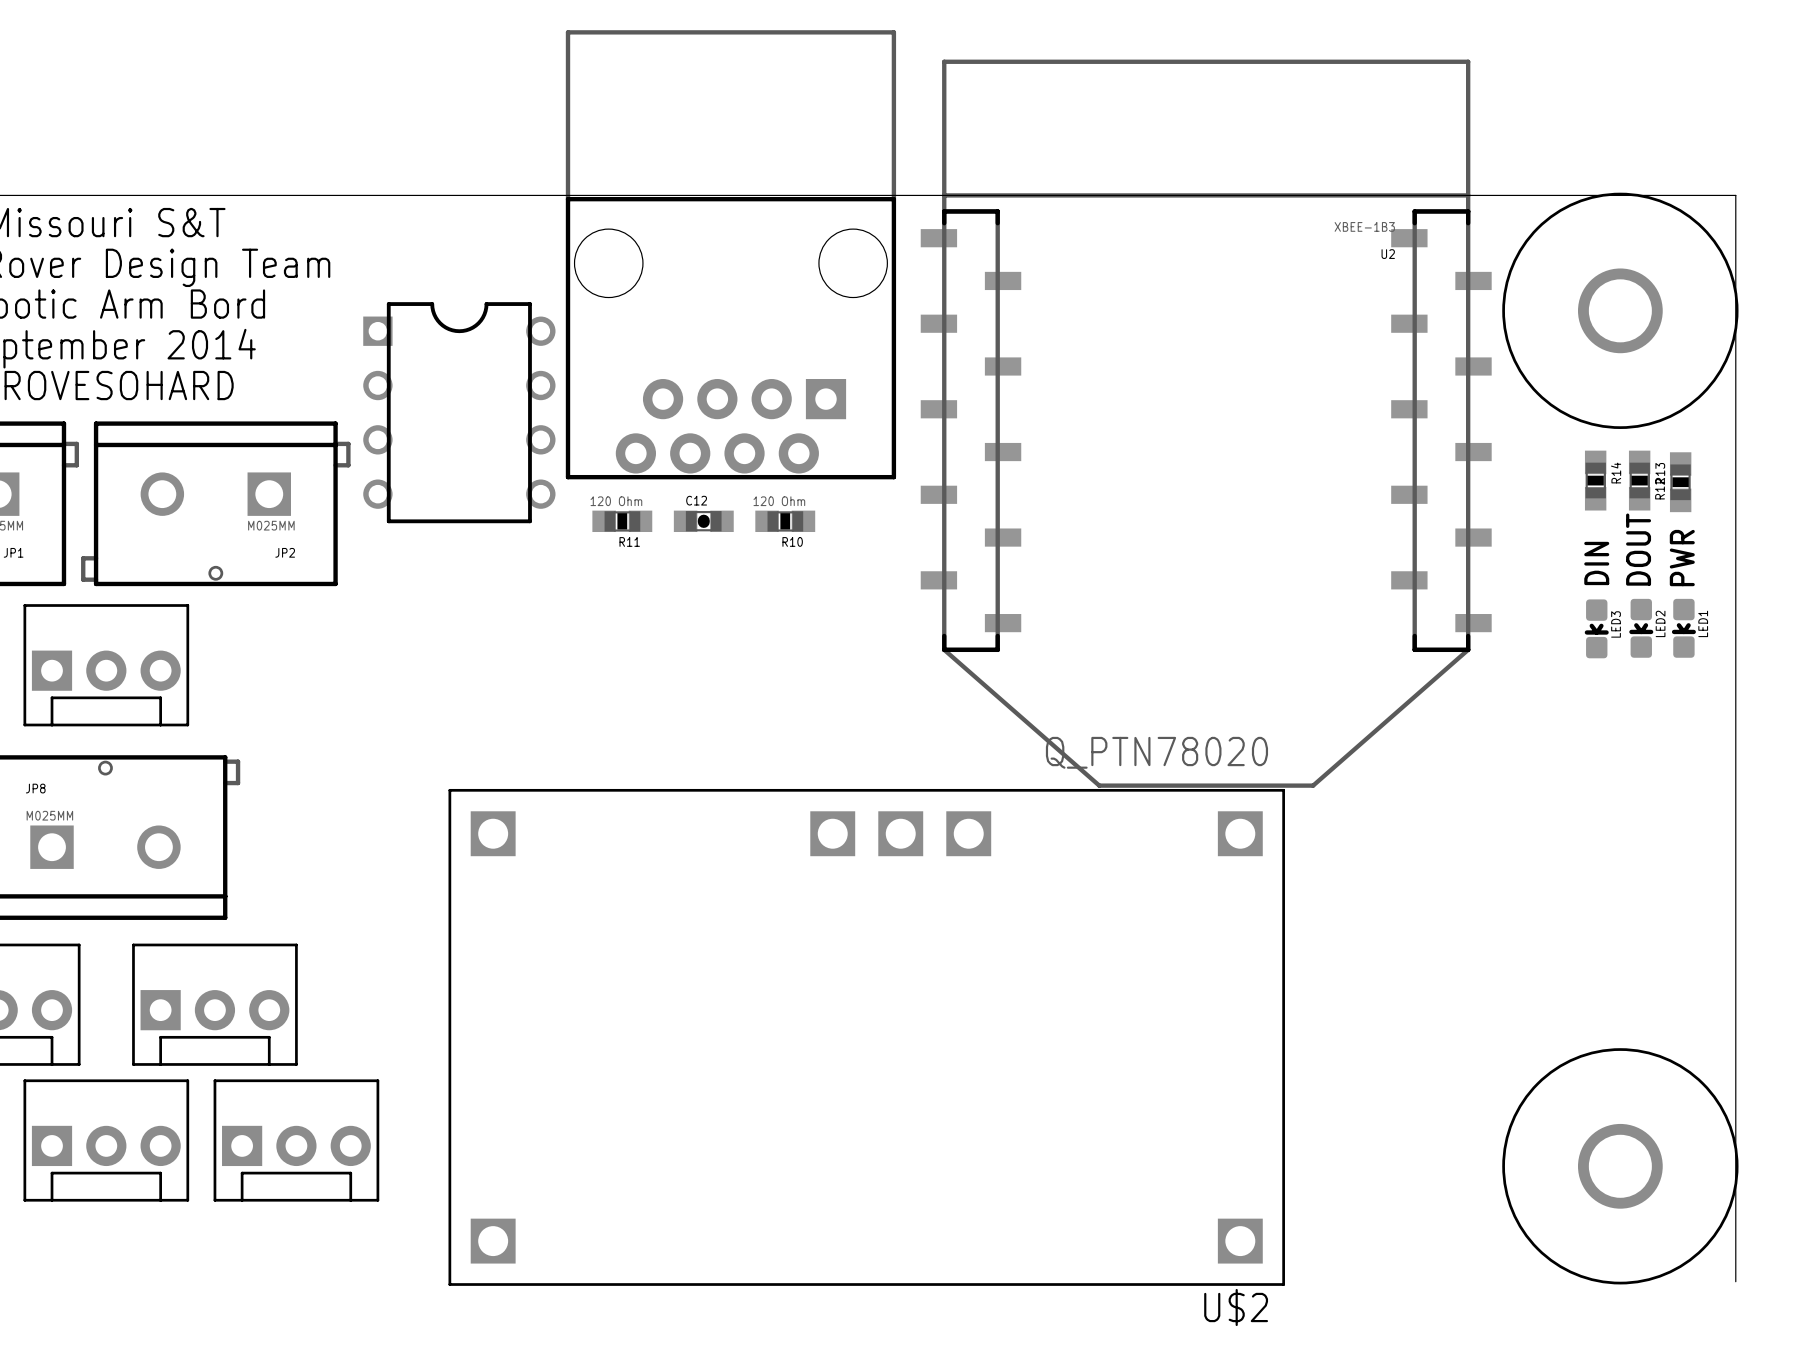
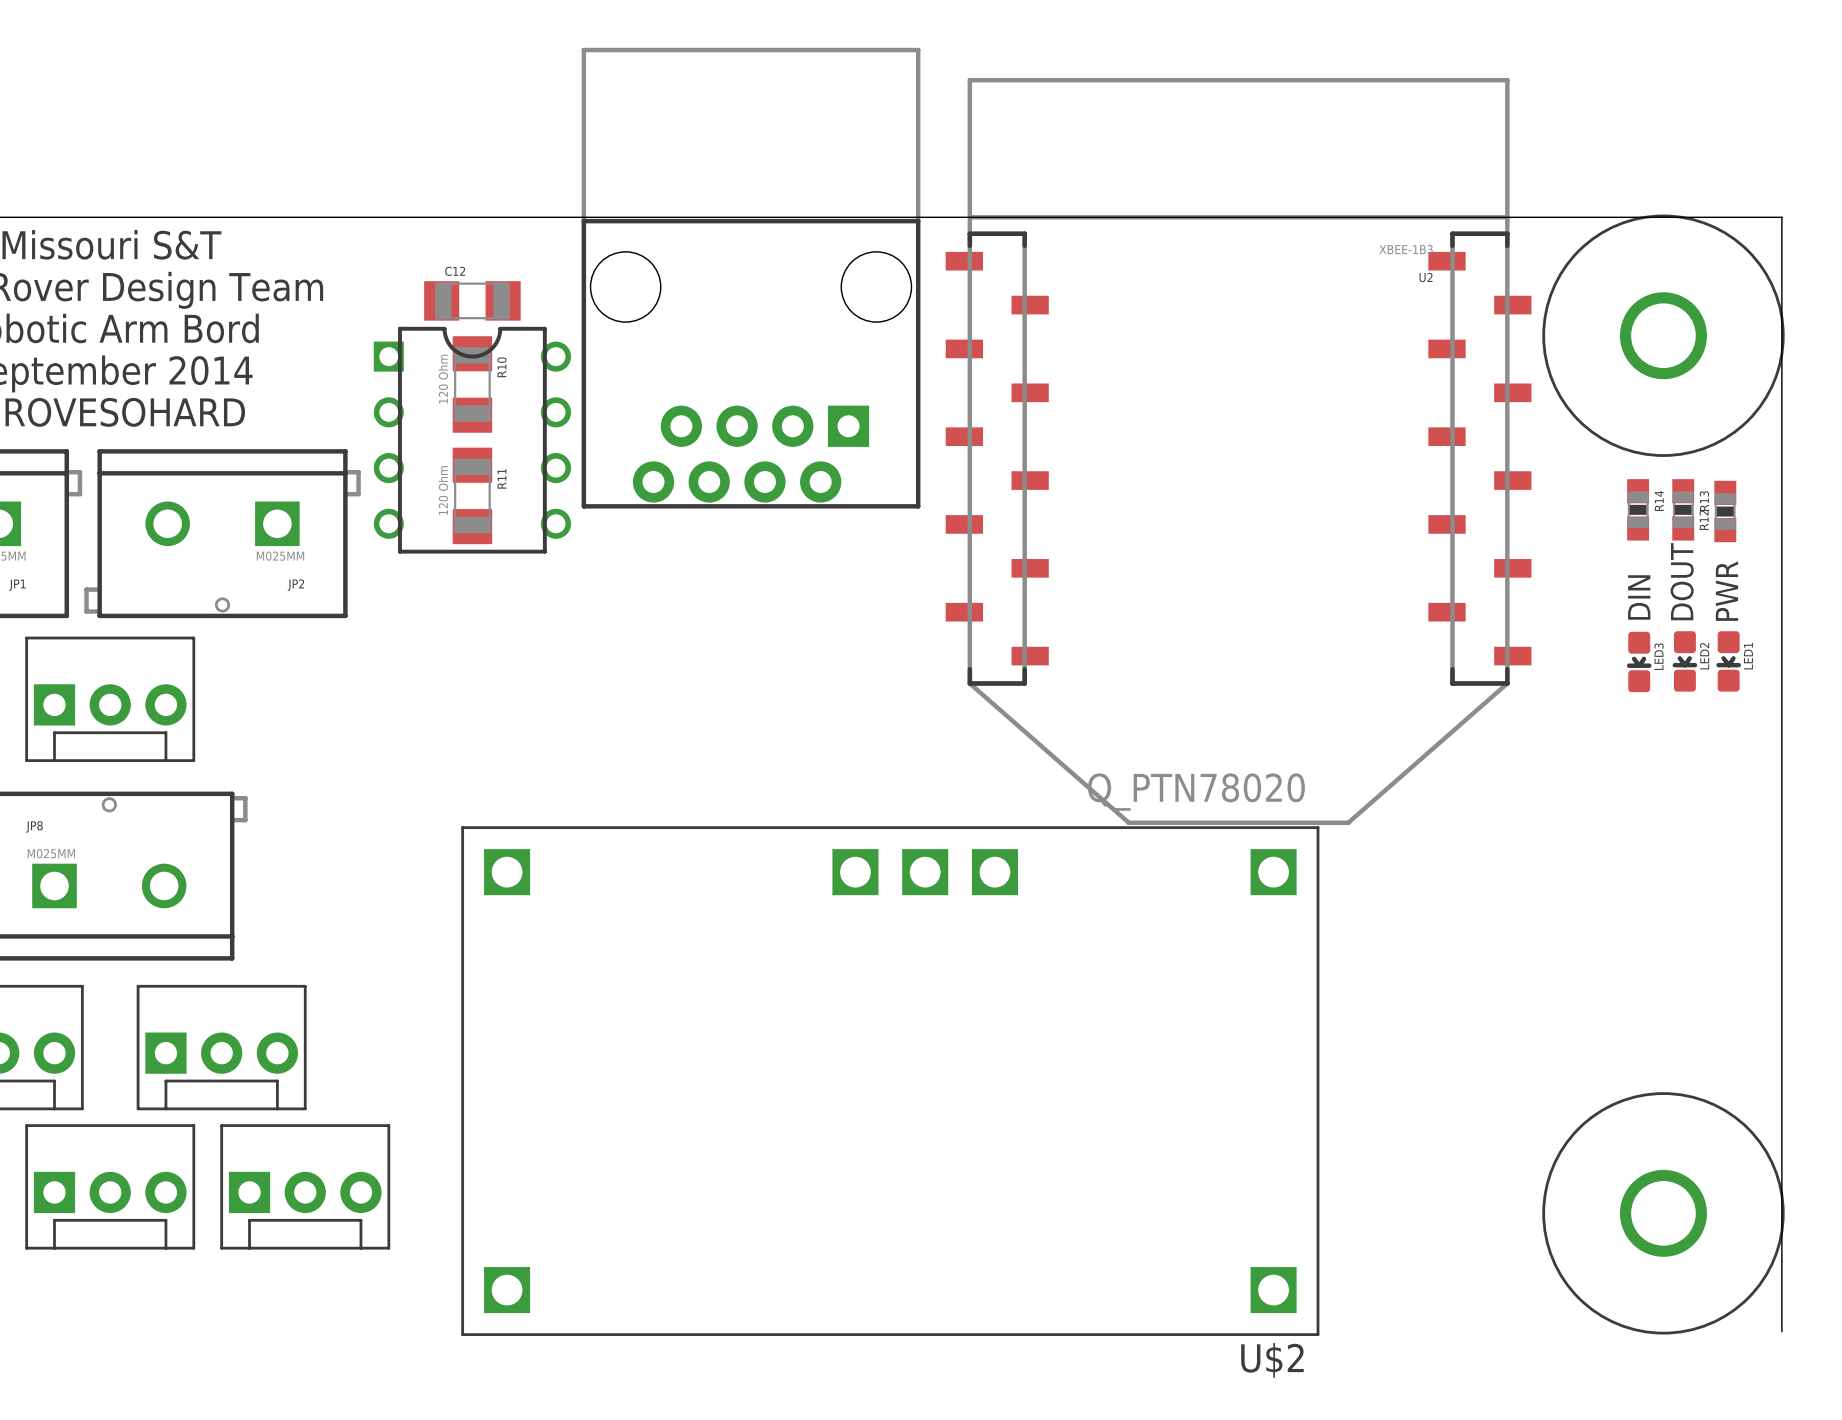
R11 footprint: [592, 510, 653, 533] -> [452, 447, 493, 545]
C12 footprint: [673, 510, 734, 533] -> [424, 281, 521, 321]
R10 footprint: [755, 510, 816, 533] -> [452, 336, 493, 433]

